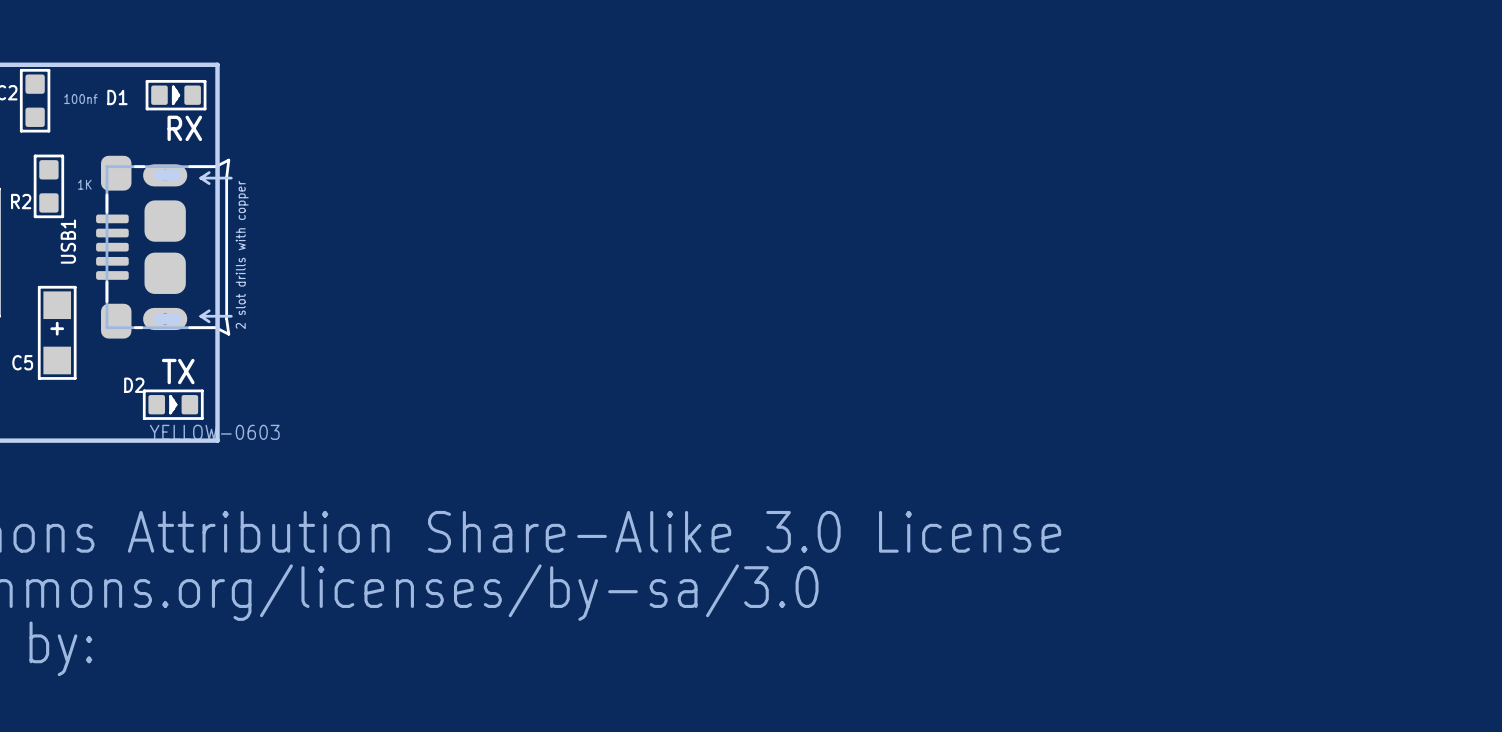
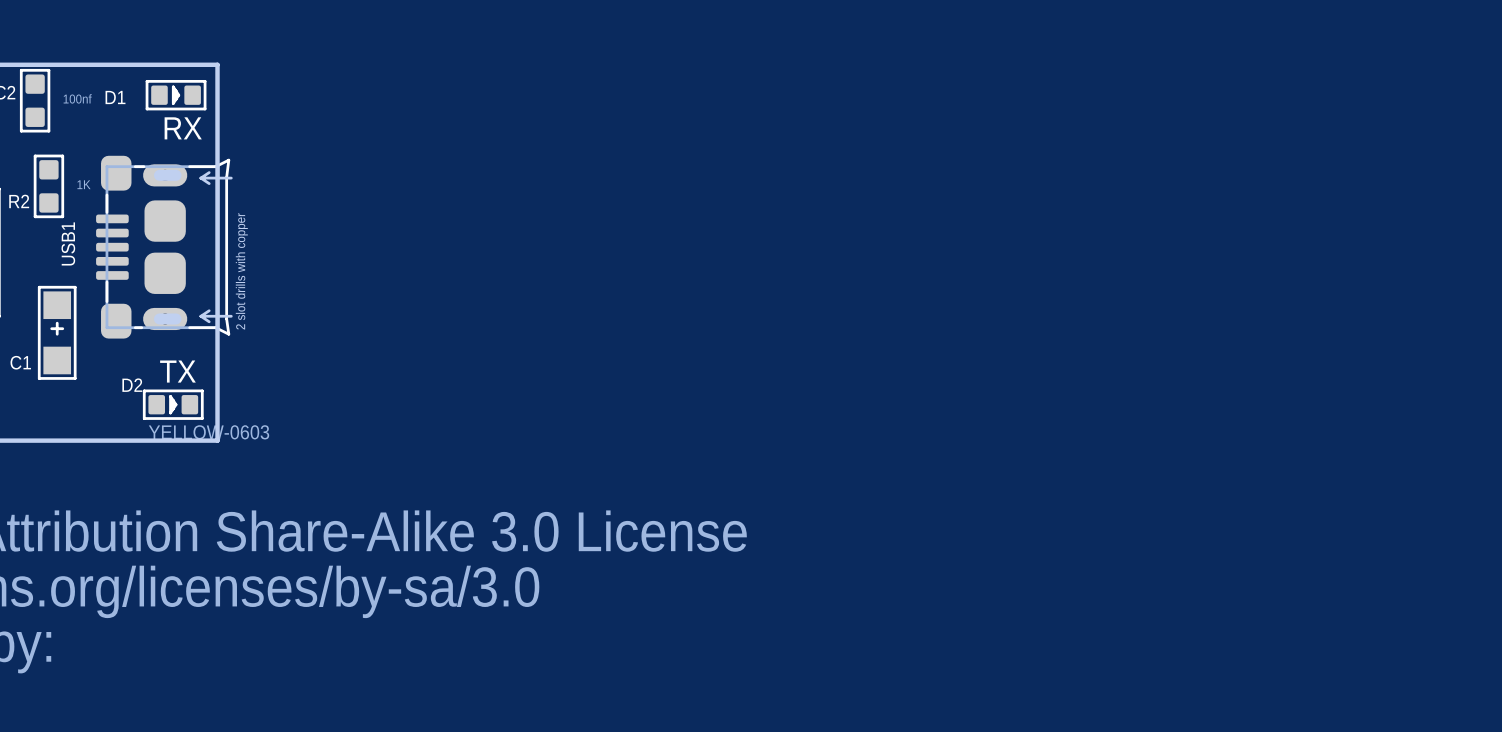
C5 name: C5 (22, 362) -> C1 (20, 362)

